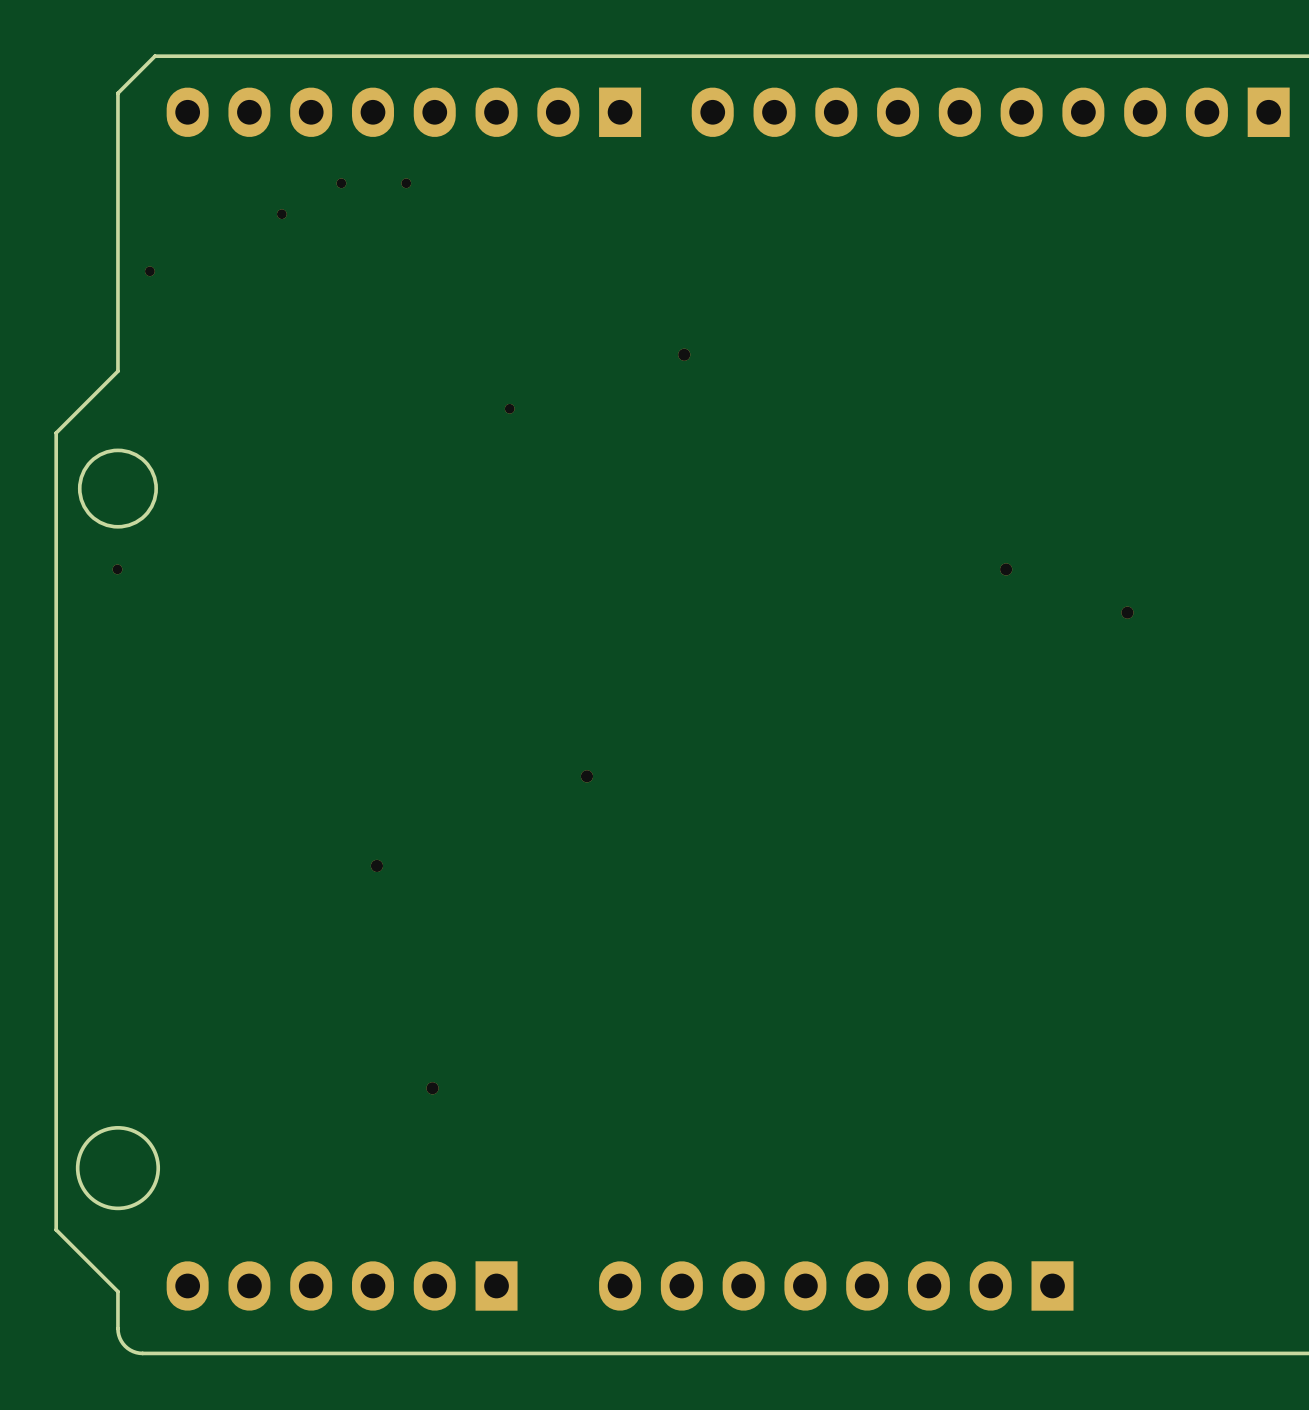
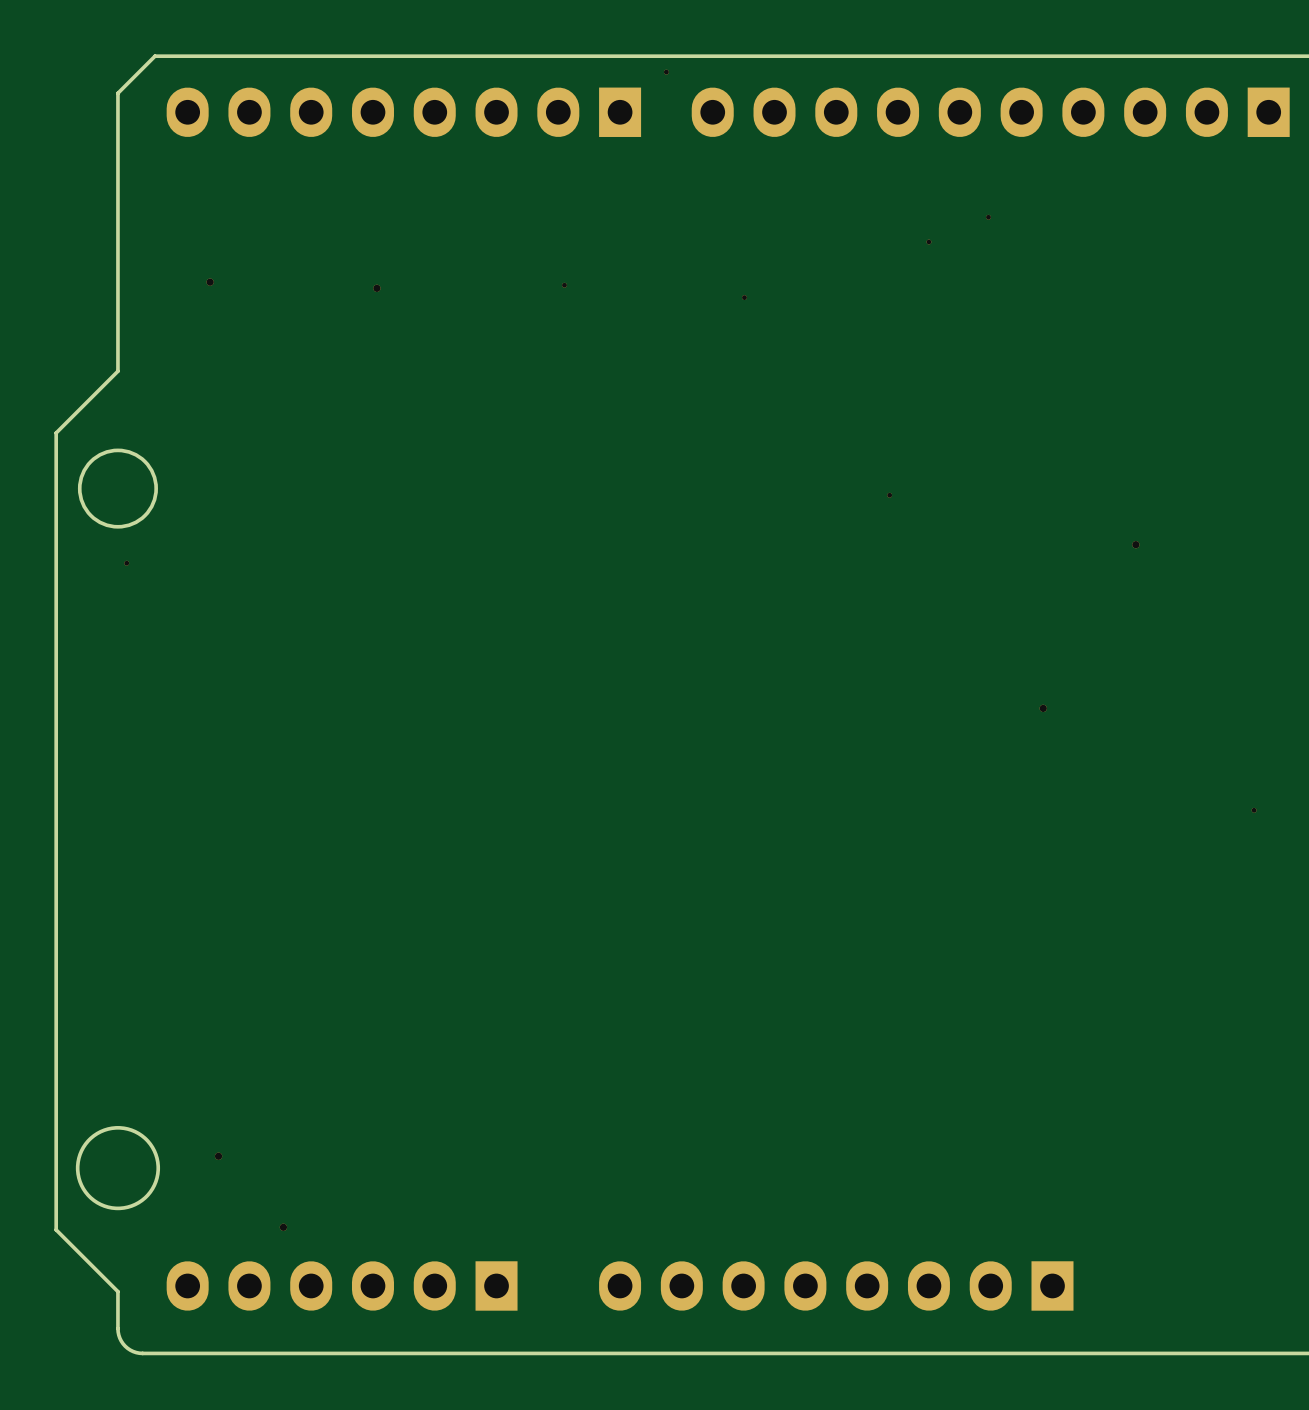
part: none -> (666, 72)
part: (341, 183) -> none
part: (406, 183) -> none
part: (281, 214) -> none
part: none -> (988, 217)
part: none -> (928, 242)
part: (149, 271) -> none
part: none -> (210, 282)
part: none -> (564, 285)
part: none -> (376, 288)
part: none -> (744, 297)
part: (684, 354) -> none
part: (509, 408) -> none
part: none -> (889, 495)
part: none -> (1135, 544)
part footprint: [112, 564, 123, 575] -> [124, 560, 130, 566]
part: (1006, 569) -> none
part: (1127, 612) -> none
part: none -> (1043, 708)
part: (586, 776) -> none
part: none -> (1254, 810)
part: (376, 865) -> none
part: (432, 1088) -> none
part: none -> (218, 1156)
part: none -> (283, 1227)

